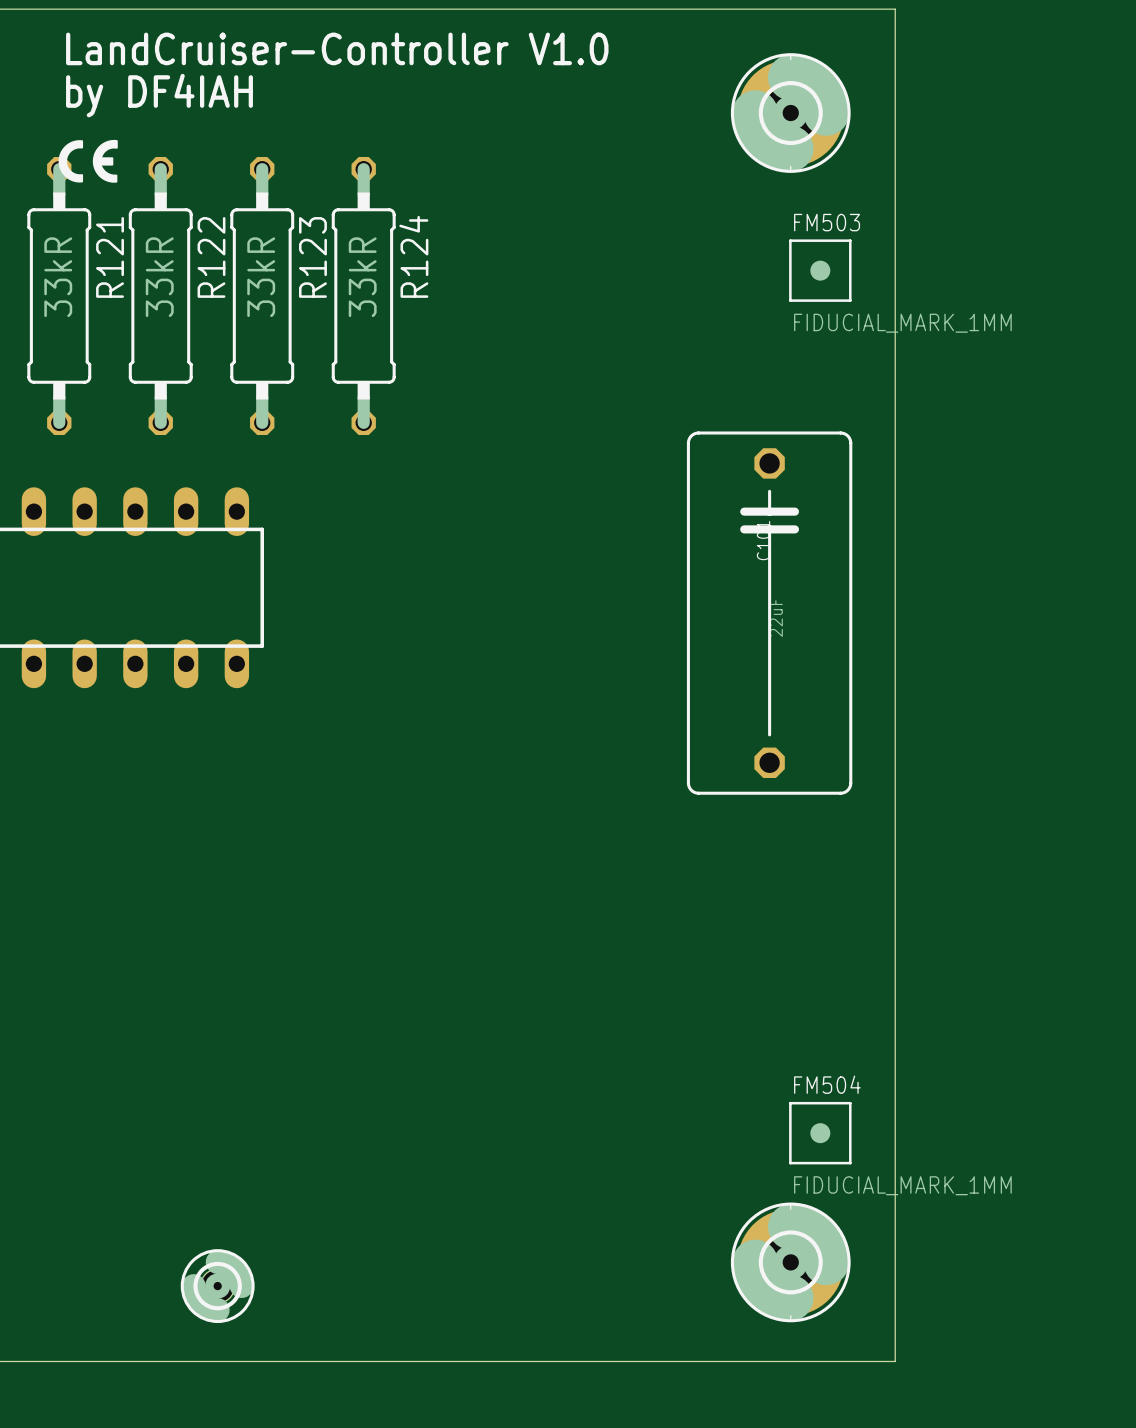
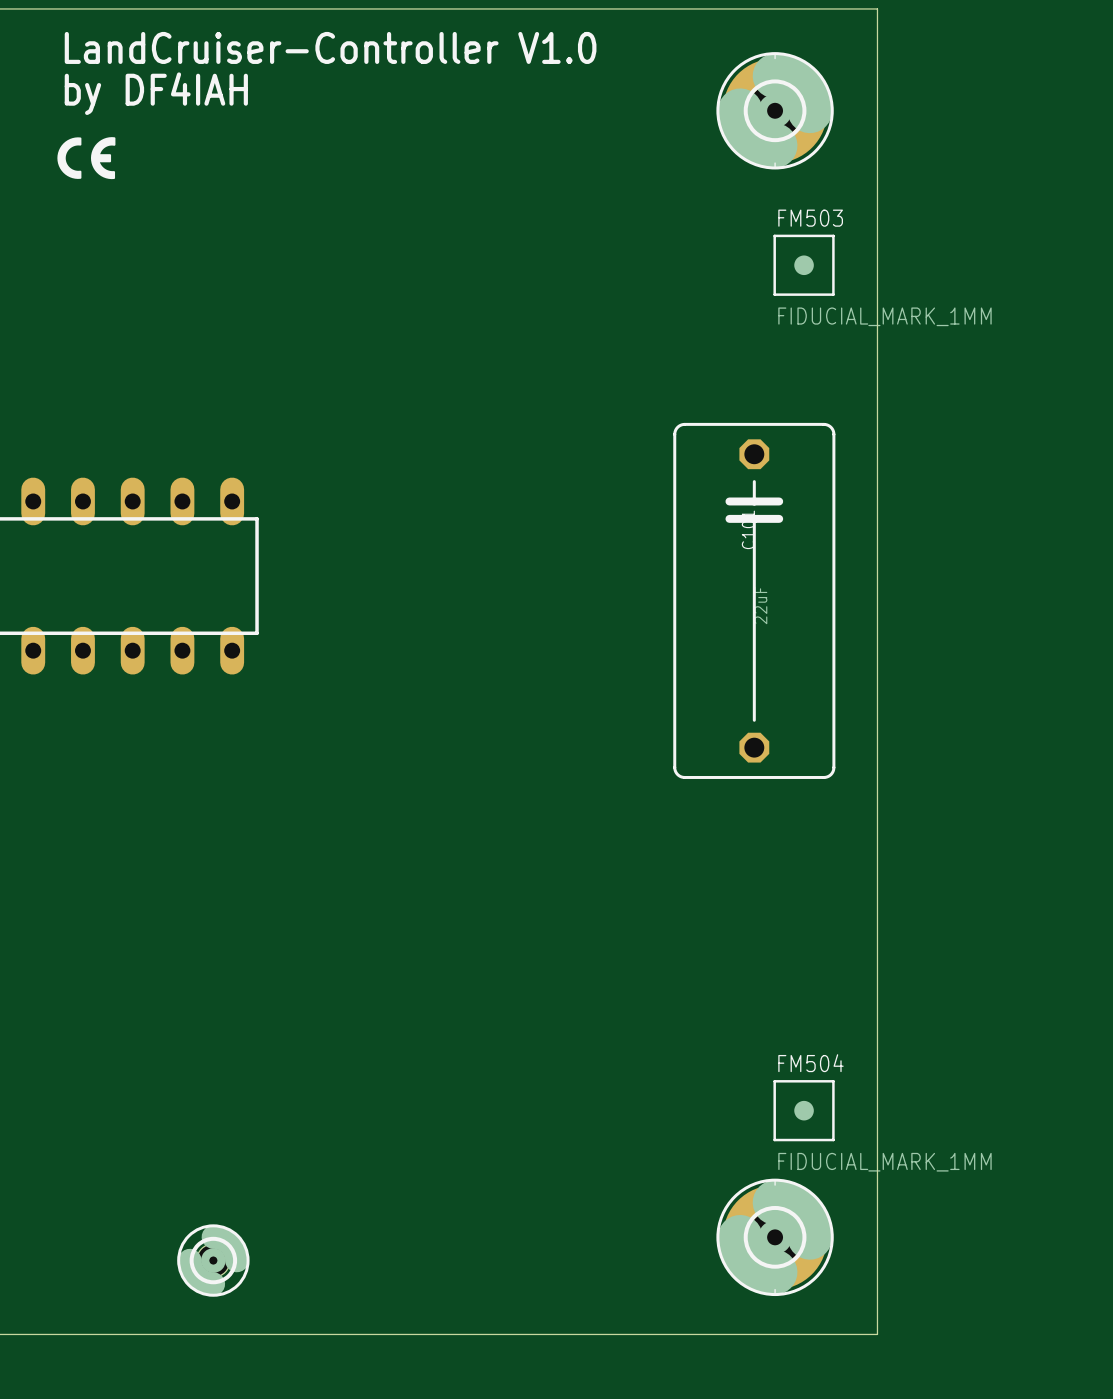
R121: 33kR (59, 296) -> none
R122: 33kR (160, 296) -> none
R123: 33kR (262, 296) -> none
R124: 33kR (363, 296) -> none

